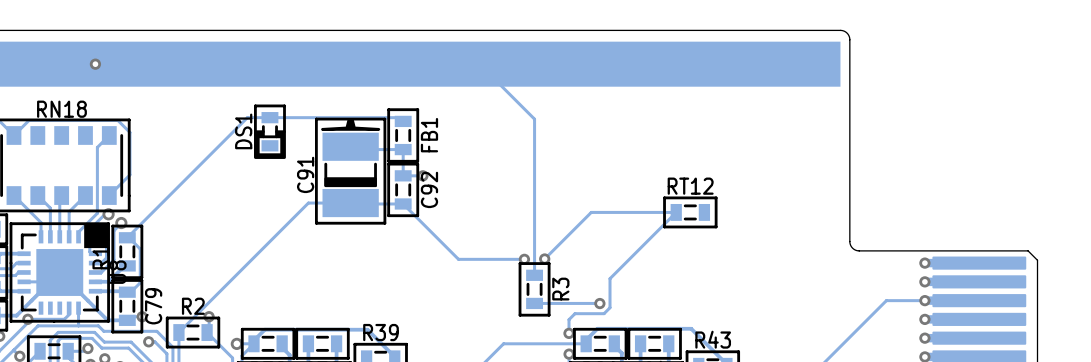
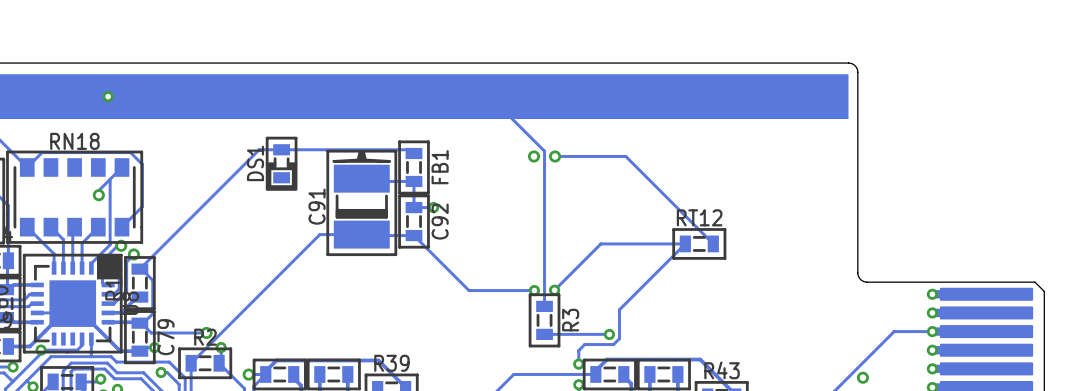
via: none -> (534, 156)
track: none -> (555, 156) (625, 156) (713, 243)
via: none -> (555, 156)
track: none -> (110, 179) (98, 190) (98, 195)
via: none -> (98, 195)
track: none -> (141, 323) (151, 332) (206, 332)
via: none -> (206, 332)
via: none -> (862, 377)

